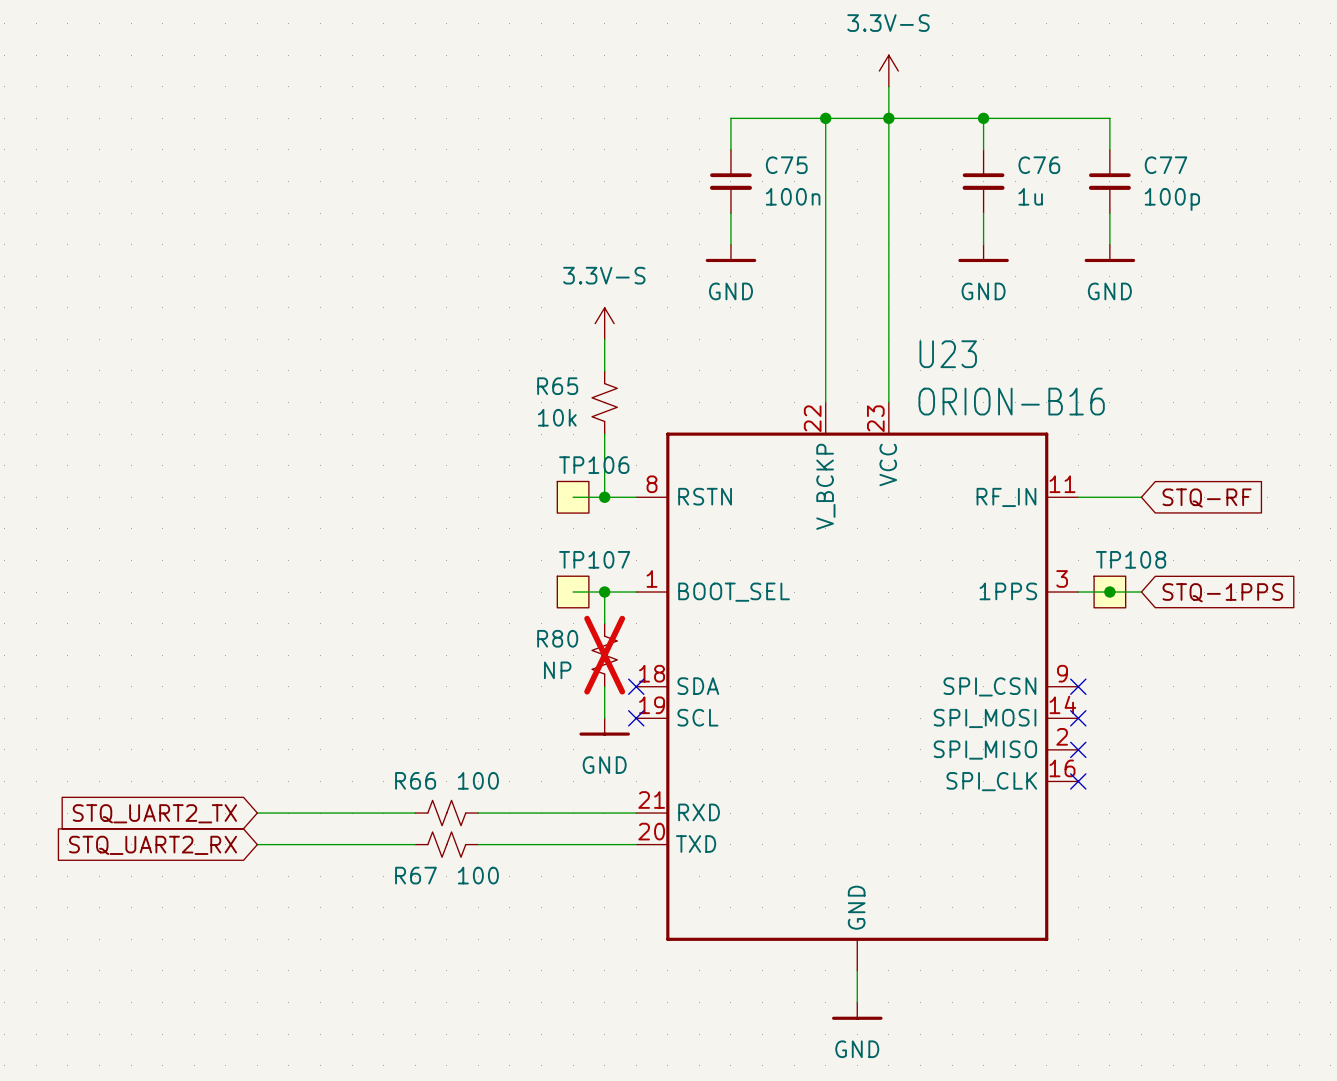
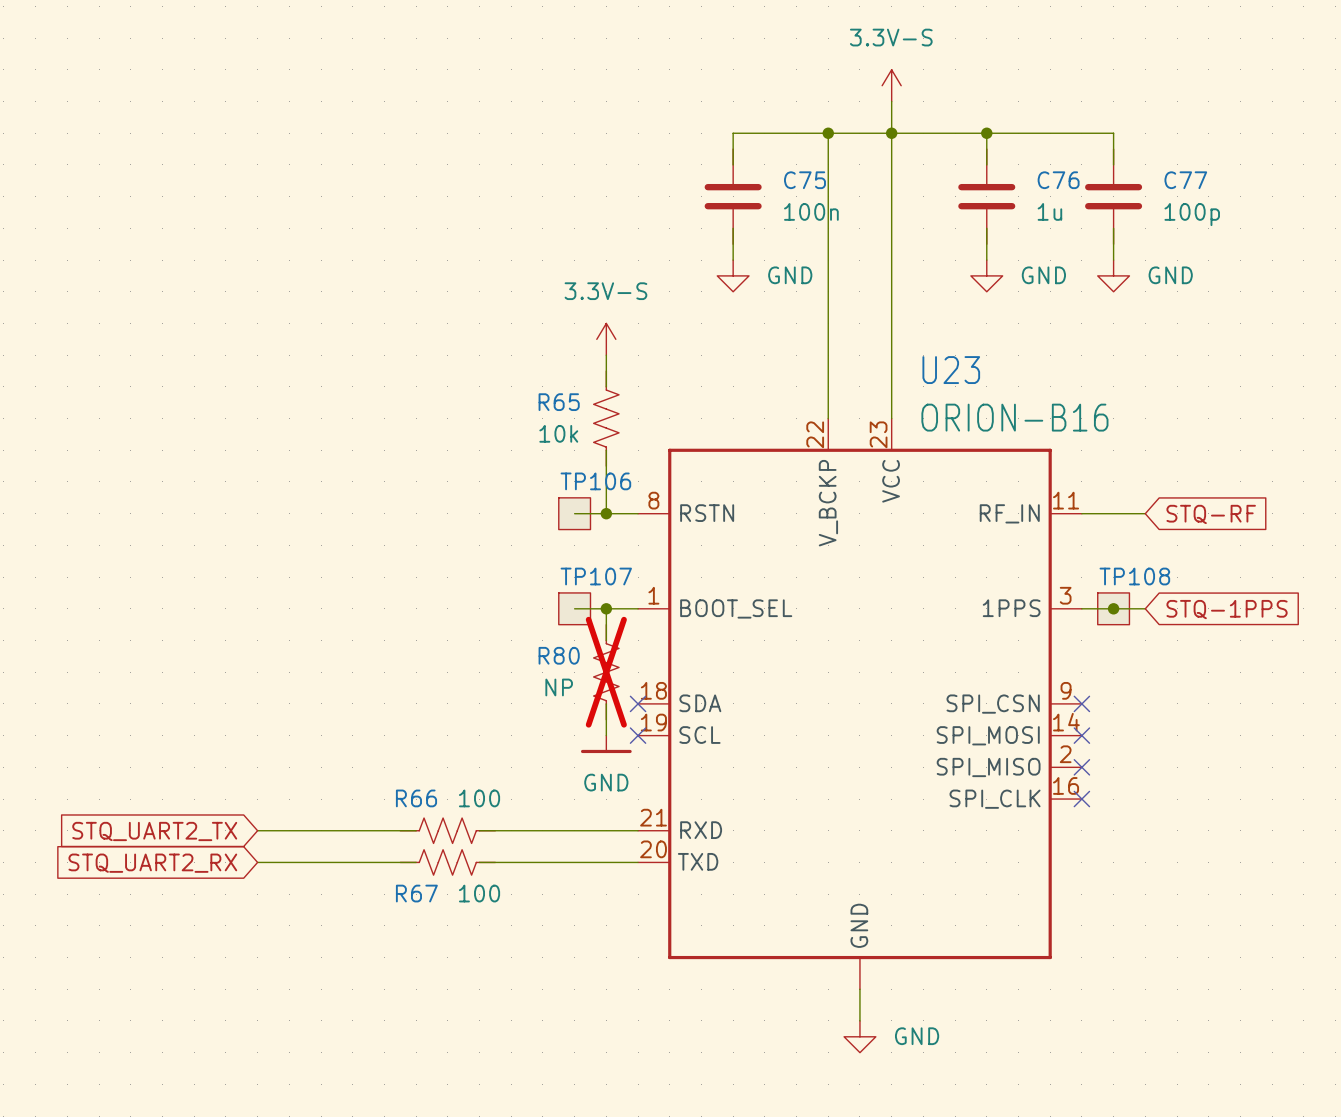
C75 symbol: [709, 149, 752, 214] -> [704, 149, 762, 245]
C76 symbol: [962, 149, 1005, 214] -> [958, 149, 1016, 245]
C77 symbol: [1088, 149, 1131, 214] -> [1085, 149, 1143, 245]
power symbol shape: [705, 244, 757, 263] -> [717, 260, 750, 292]
power symbol shape: [958, 244, 1009, 263] -> [970, 260, 1003, 292]
power symbol shape: [1084, 244, 1136, 263] -> [1097, 260, 1130, 292]
power symbol text position: GND (730, 291) -> GND (790, 275)
power symbol text position: GND (983, 291) -> GND (1043, 275)
power symbol text position: GND (1109, 291) -> GND (1170, 275)
R65 symbol: [592, 370, 618, 435] -> [593, 371, 620, 467]
R80 symbol: [592, 623, 618, 687] -> [593, 624, 620, 720]
R66 symbol: [415, 800, 479, 826] -> [400, 818, 496, 844]
R67 symbol: [415, 831, 479, 858] -> [400, 849, 496, 876]
power symbol shape: [832, 1002, 883, 1020] -> [844, 1020, 876, 1053]
power symbol text position: GND (857, 1049) -> GND (917, 1036)

